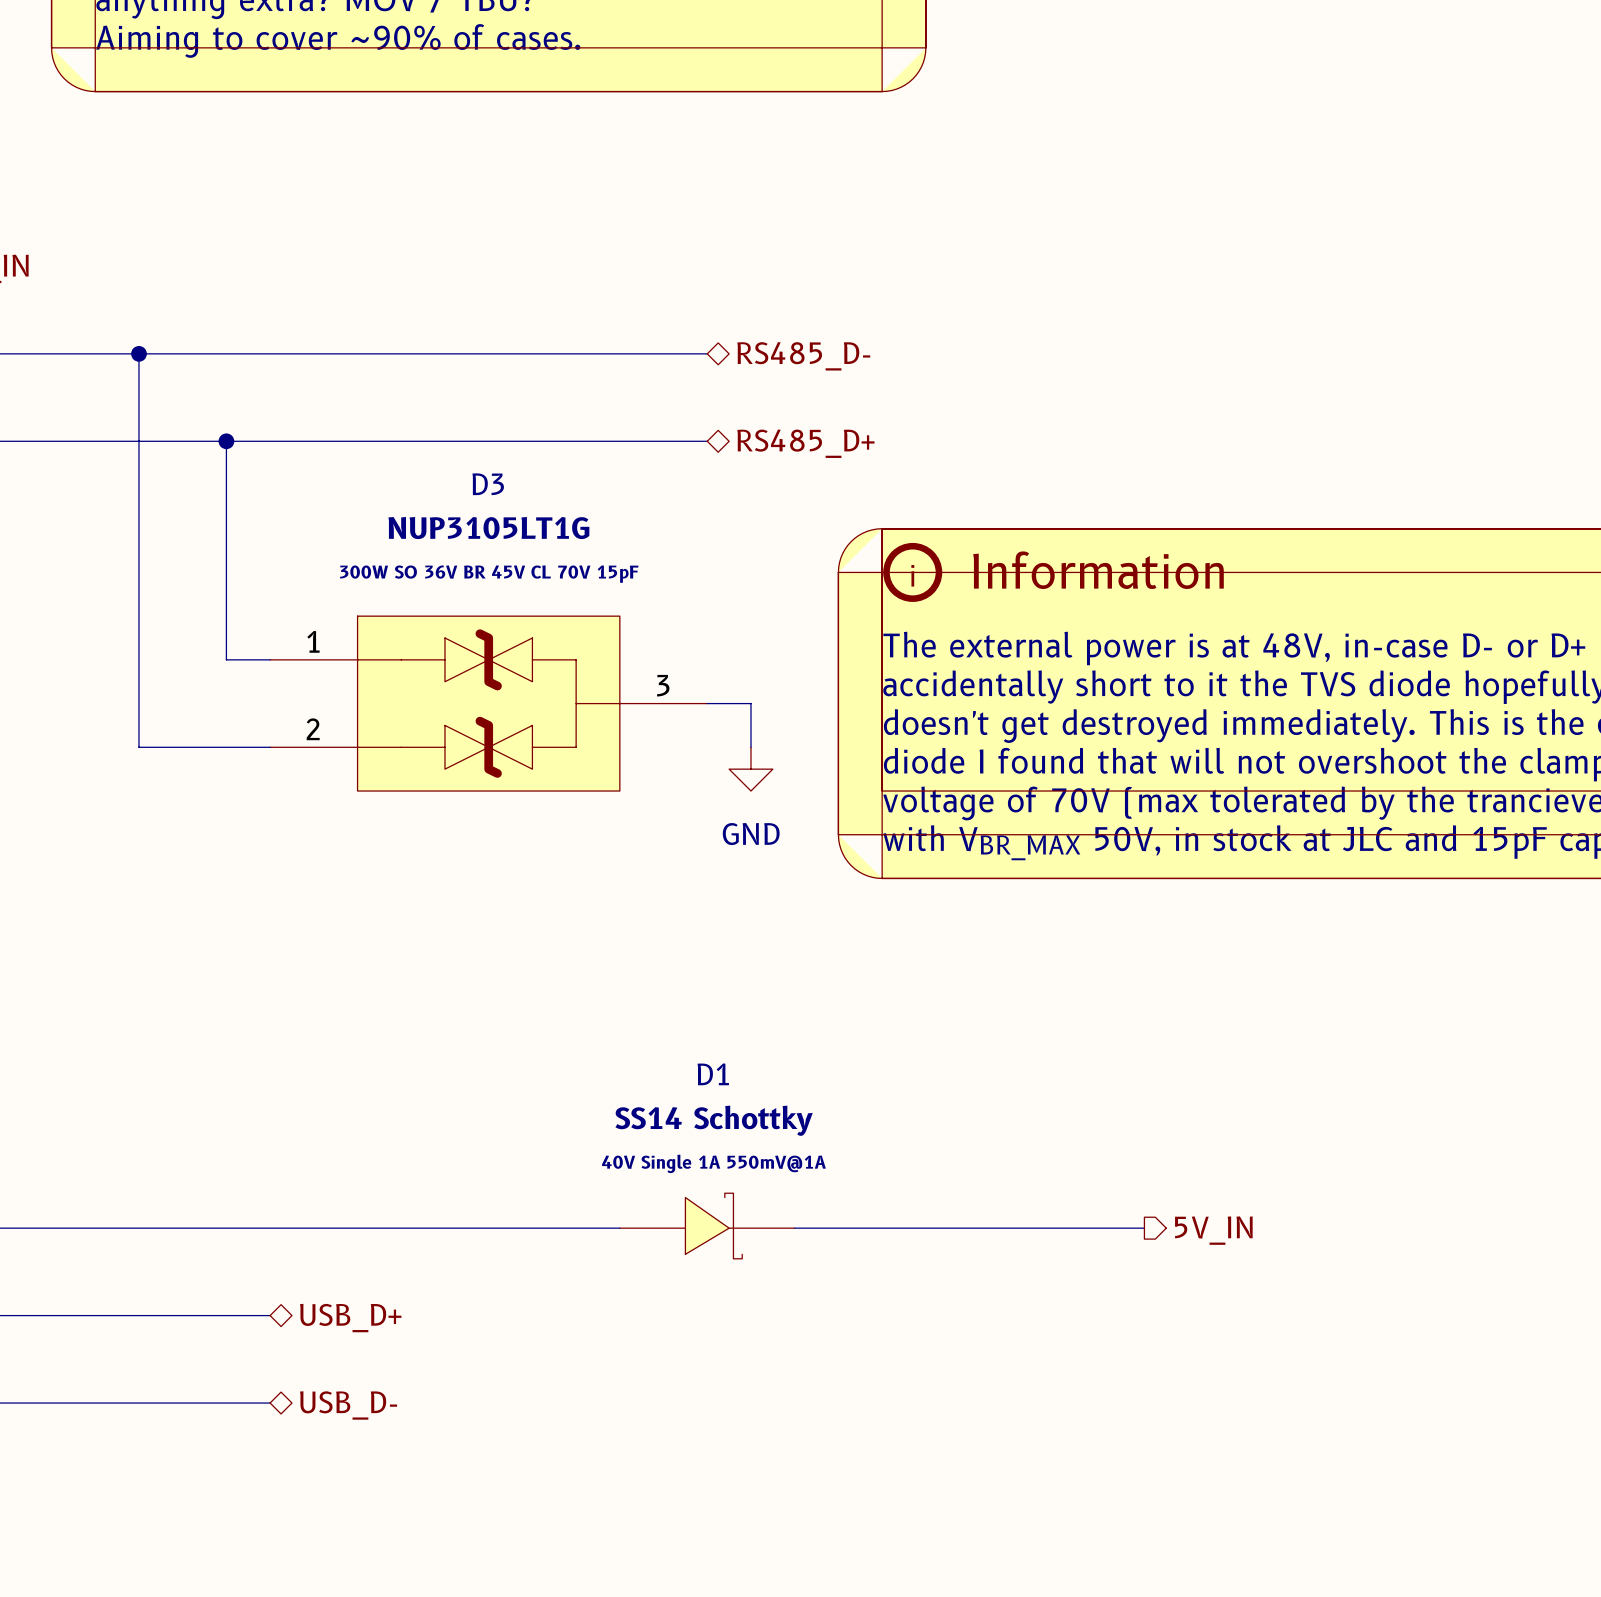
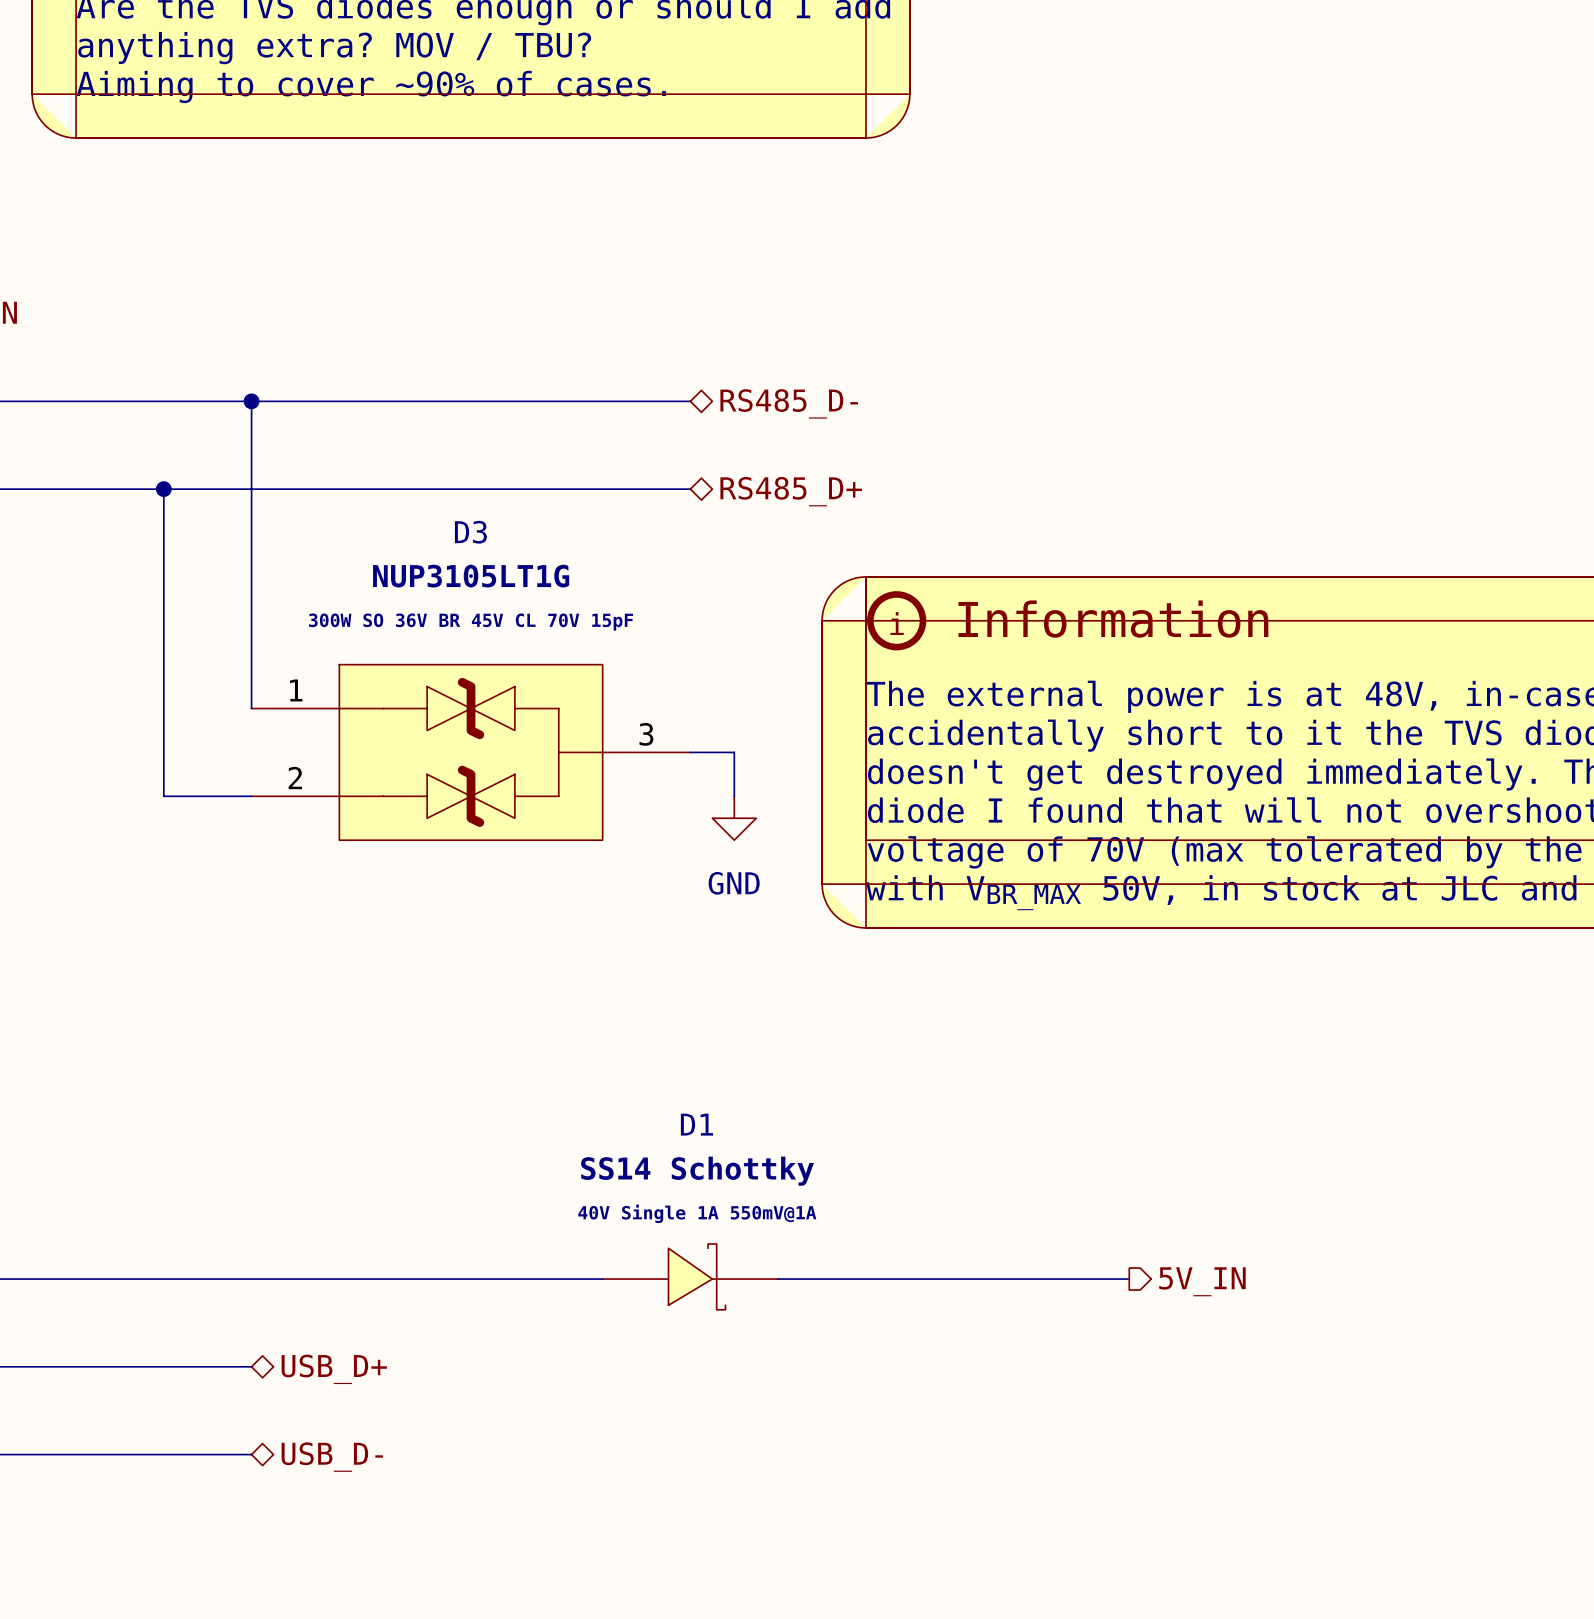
wire: (138, 353) (138, 747) (182, 747) -> (163, 489) (163, 796)
junction: (138, 353) -> none
junction: none -> (251, 401)
wire: (226, 441) (226, 659) (270, 659) -> (251, 401) (251, 708)
junction position: (226, 441) -> (163, 489)

